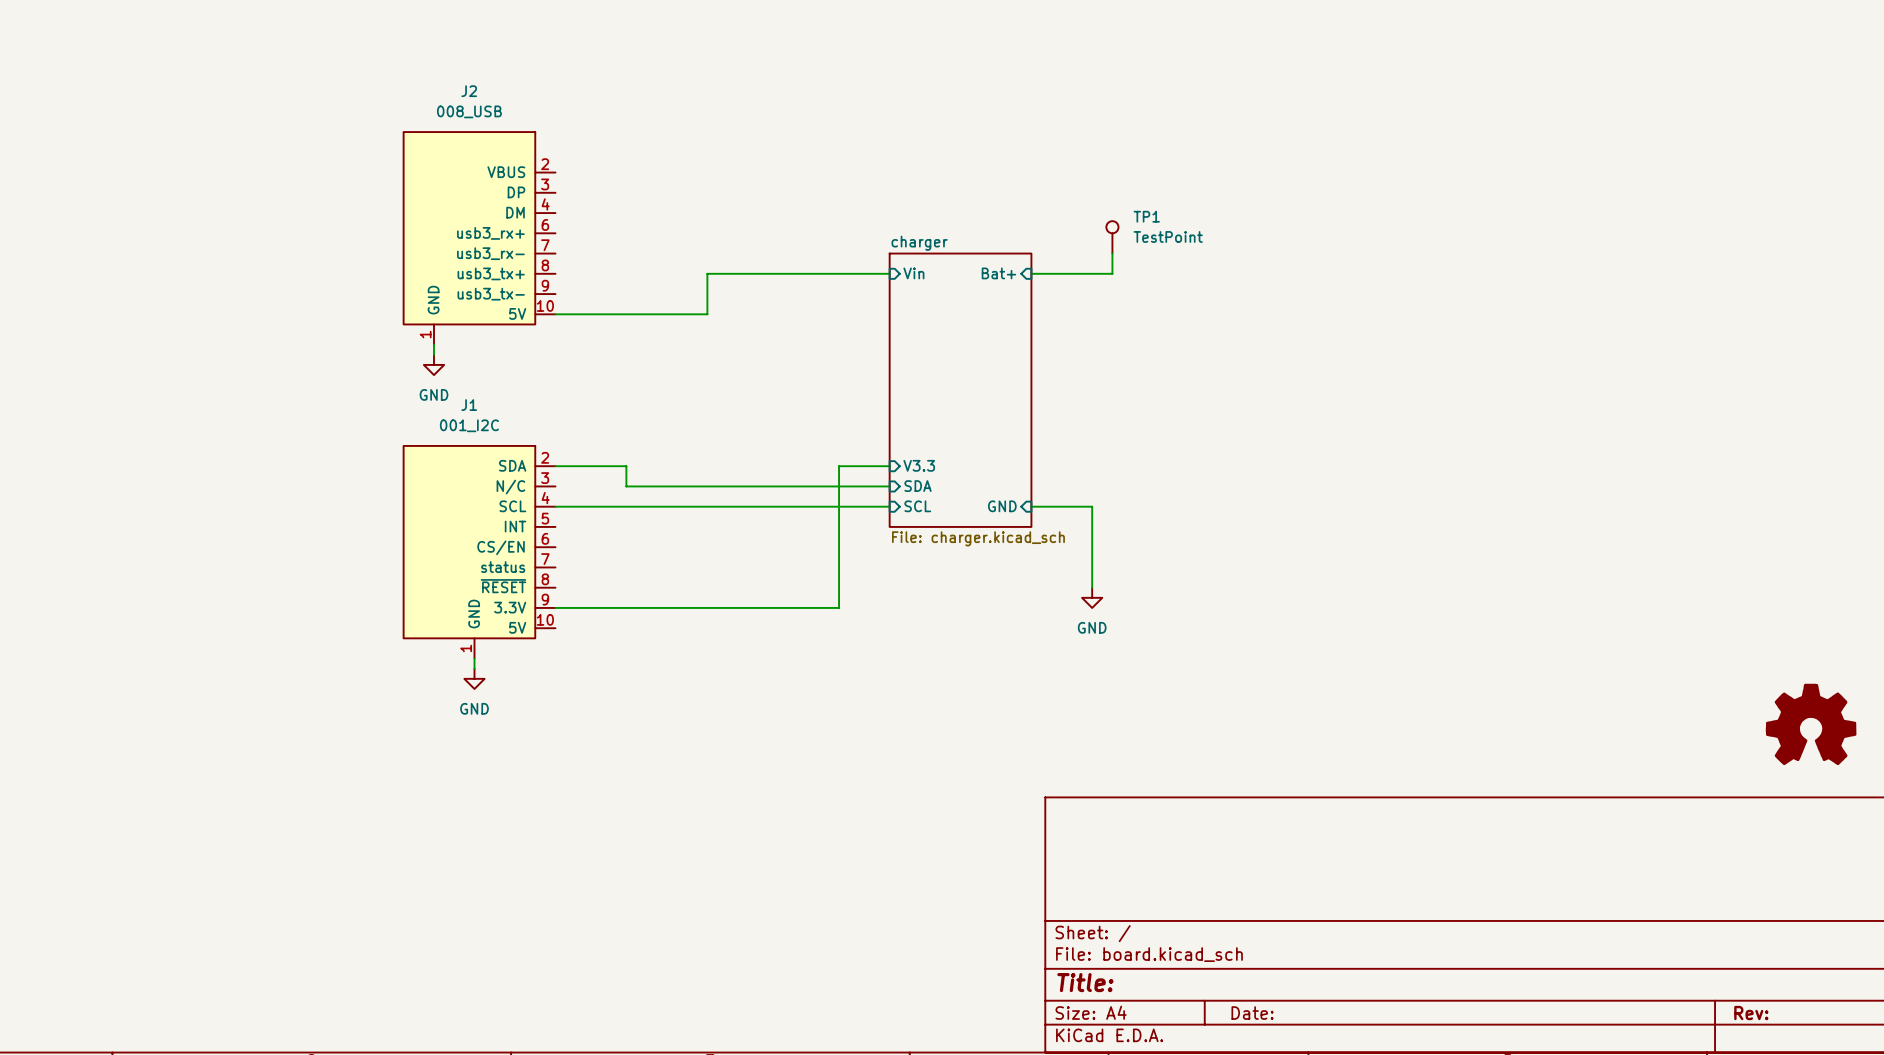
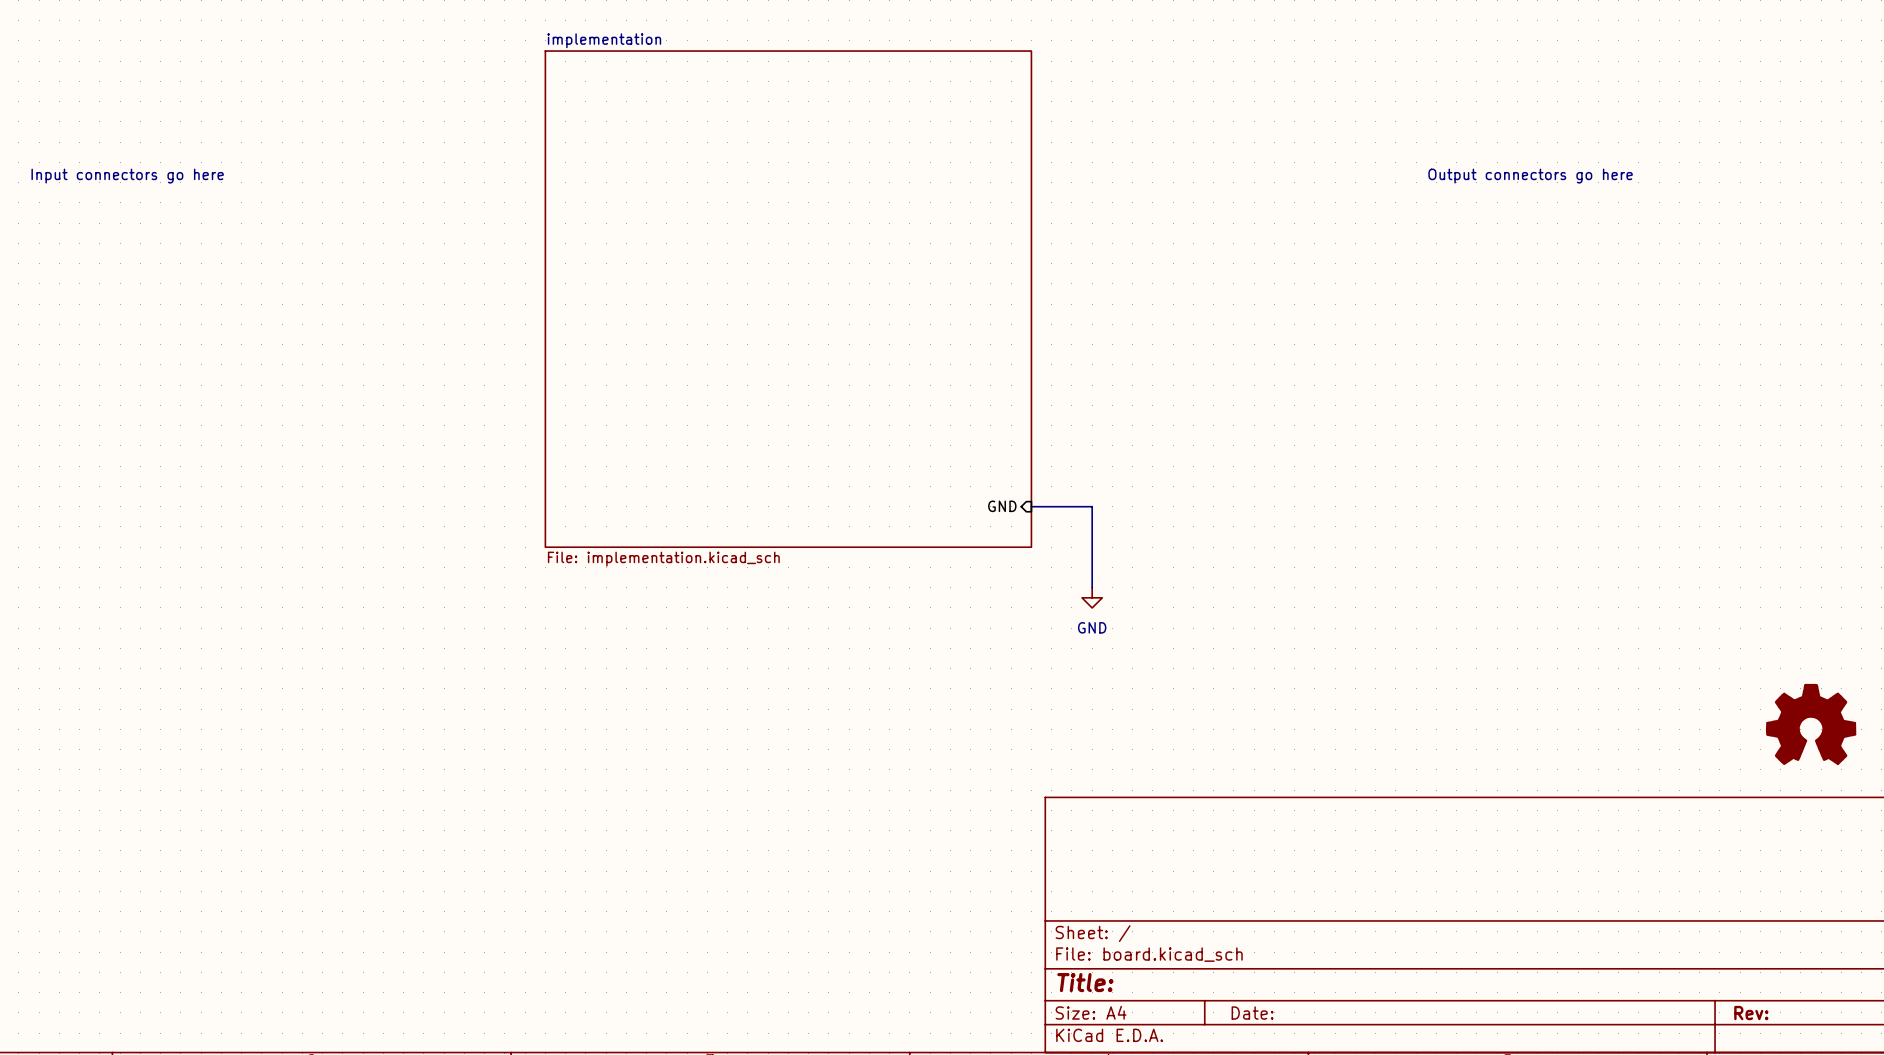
text: none -> Input connectors go here (127, 176)
text: none -> Output connectors go here (1530, 176)
TP1: TestPoint (1112, 237) -> none
J2: 008_USB (479, 238) -> none
wire: (1112, 253) (1112, 273) (1031, 273) -> none
wire: (889, 273) (707, 273) (707, 314) (555, 314) -> none
sheet pin: Vin (913, 273) -> none
sheet pin: Bat+ (998, 273) -> none
sheet implementation: none -> File: implementation.kicad_sch (788, 299)
wire: (433, 344) (433, 354) -> none
power symbol: GND (433, 364) -> none
sheet charger: File: charger.kicad_sch (960, 390) -> none
sheet pin: V3.3 (919, 465) -> none
wire: (555, 466) (626, 466) (626, 486) (889, 486) -> none
wire: (889, 466) (839, 466) (839, 607) (555, 607) -> none
sheet pin: SDA (918, 486) -> none
wire: (555, 506) (889, 506) -> none
sheet pin: SCL (917, 506) -> none
J1: 001_I2C (479, 552) -> none
wire: (474, 658) (474, 668) -> none
power symbol: GND (474, 678) -> none

